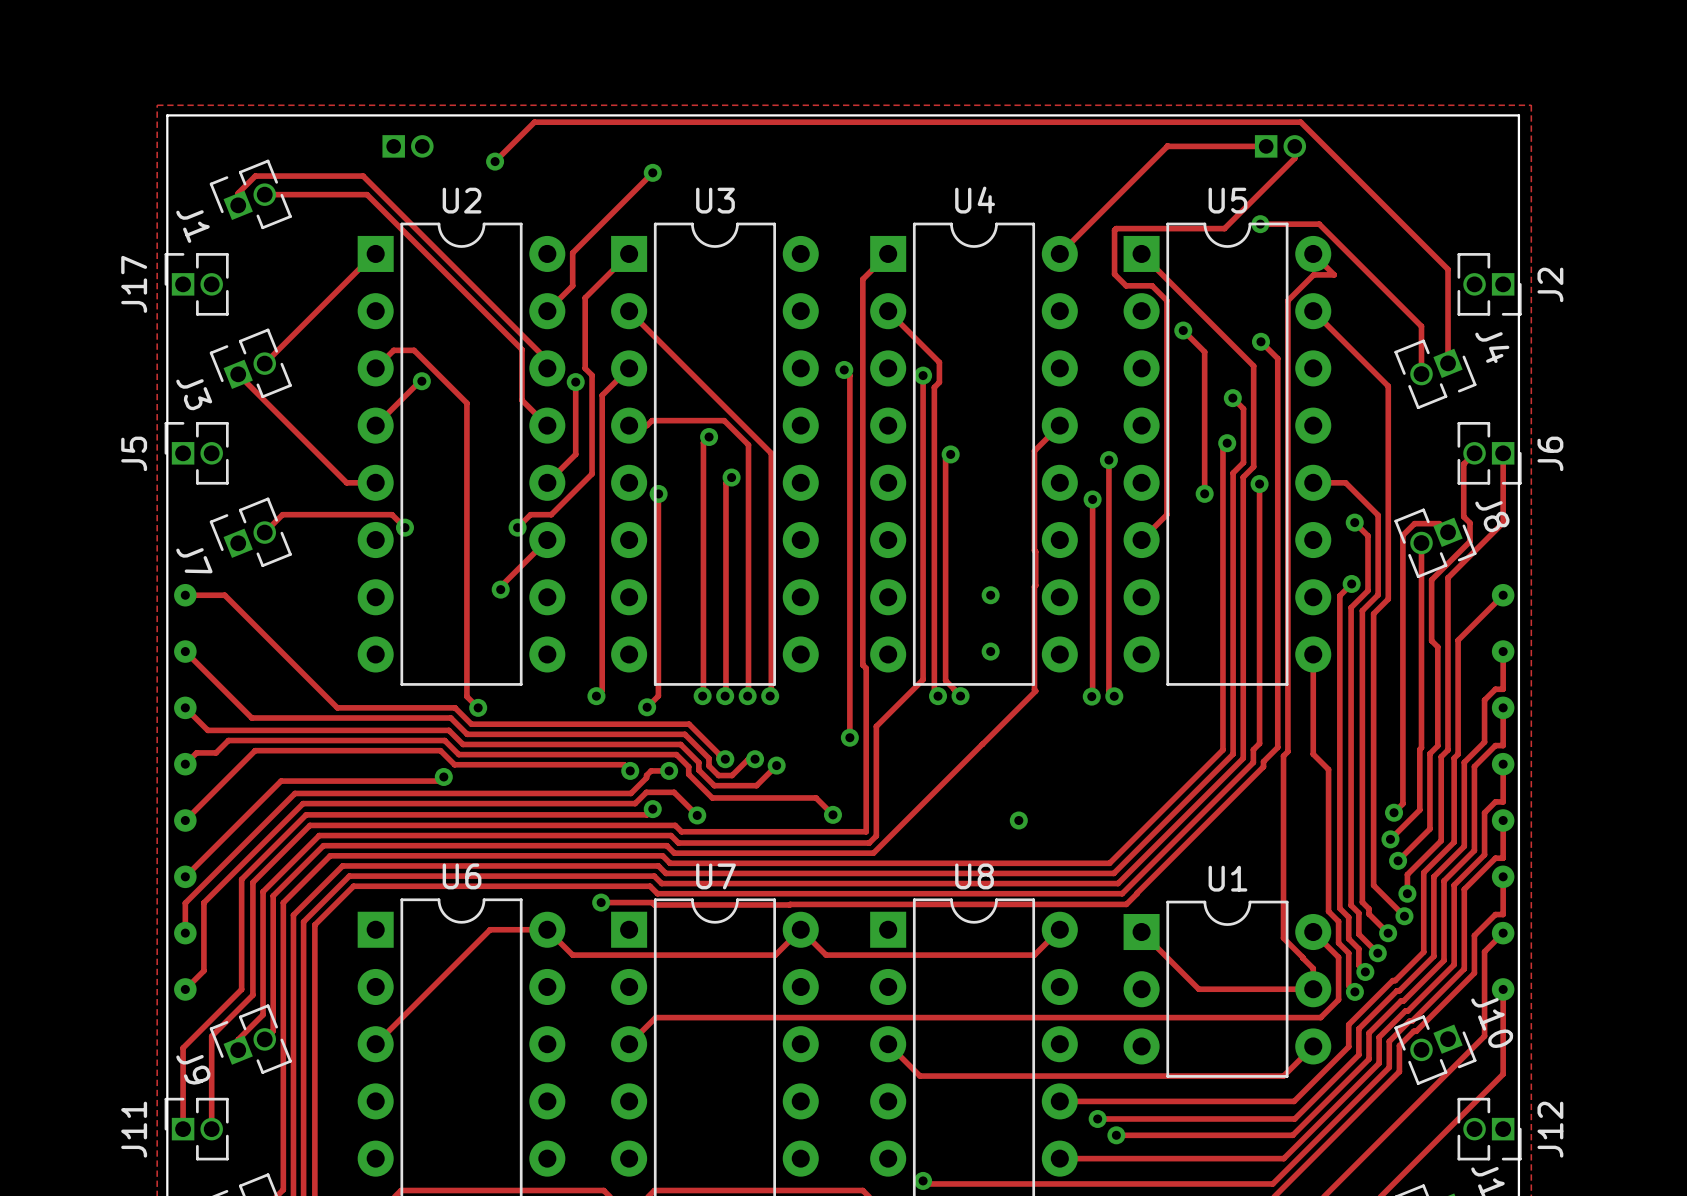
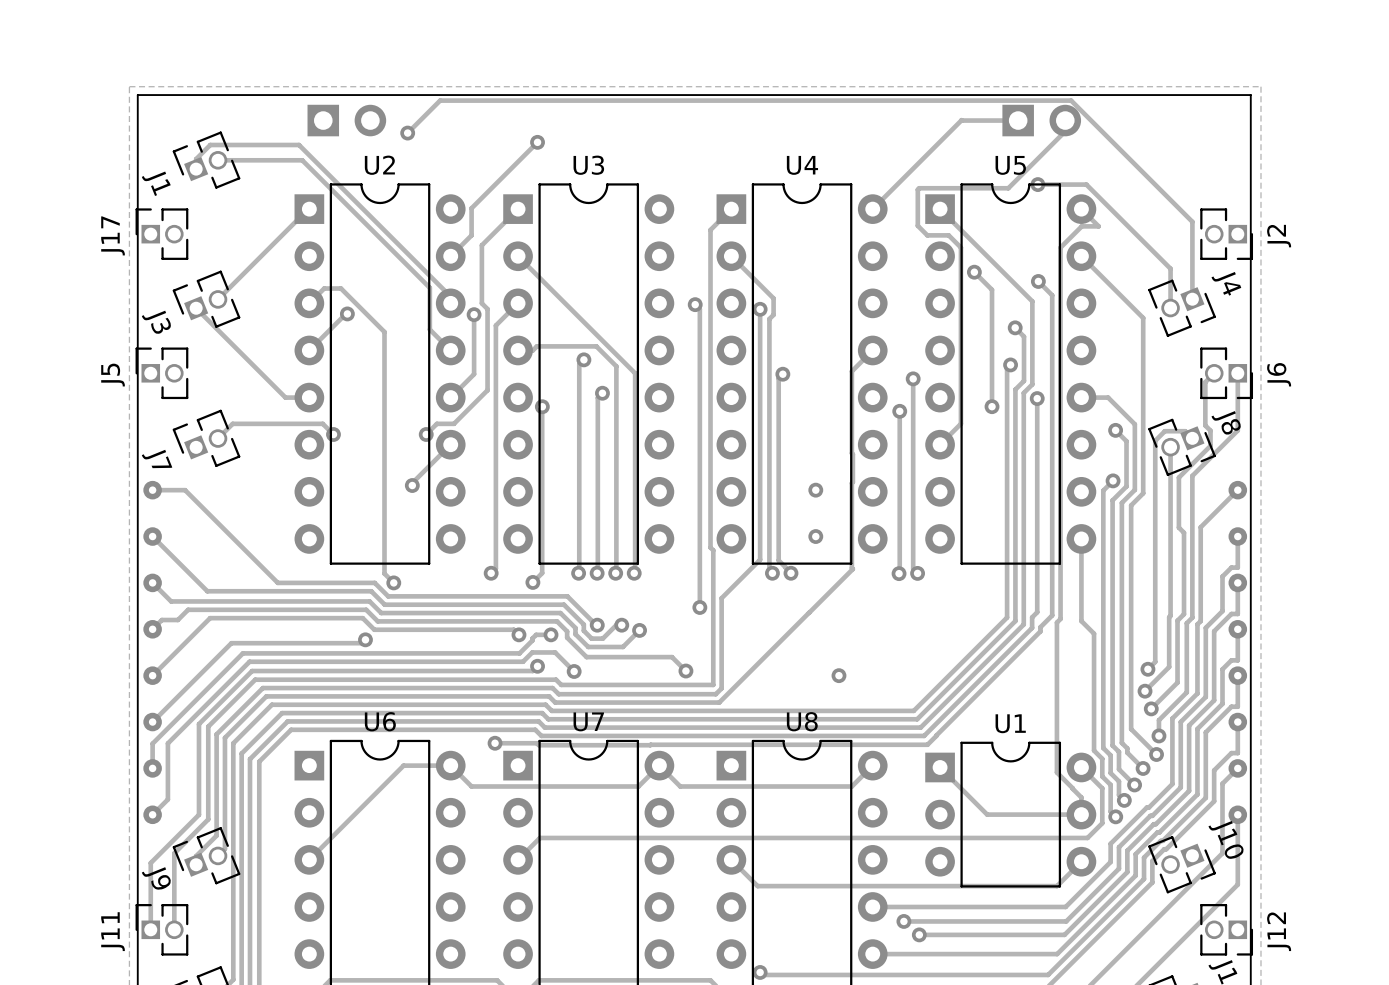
part footprint: [382, 135, 434, 158] -> [307, 104, 387, 137]
part footprint: [1254, 135, 1307, 158] -> [1002, 104, 1082, 137]
track: (1236, 146) (1266, 146) -> none

